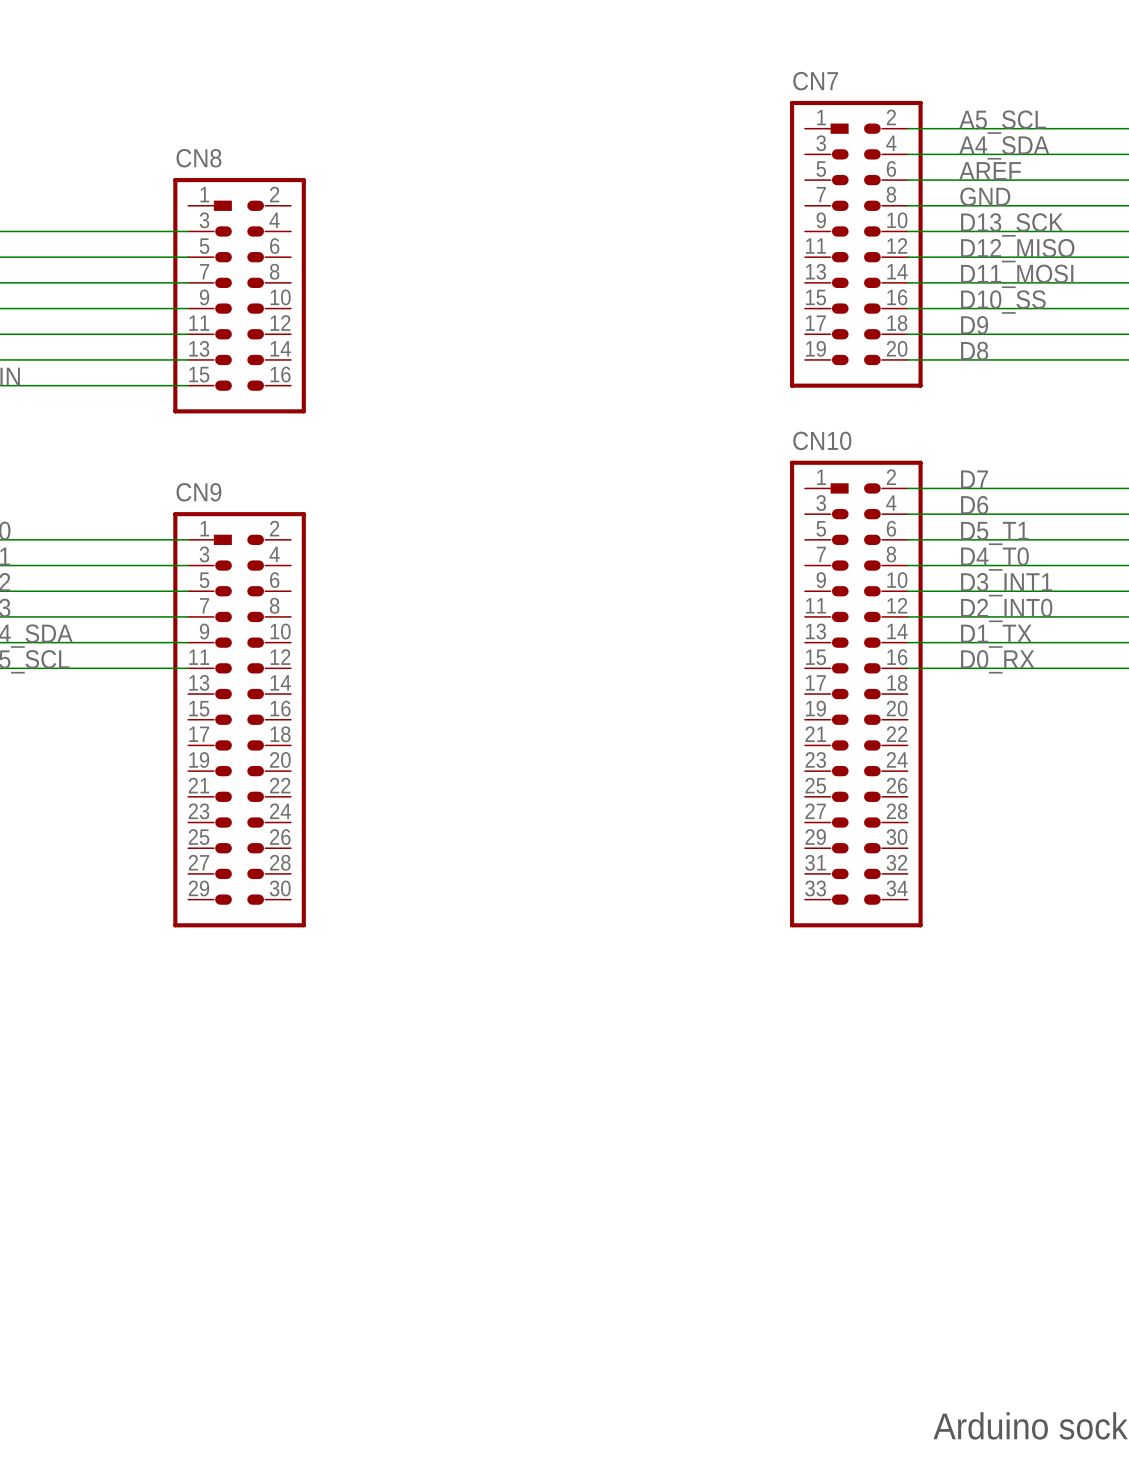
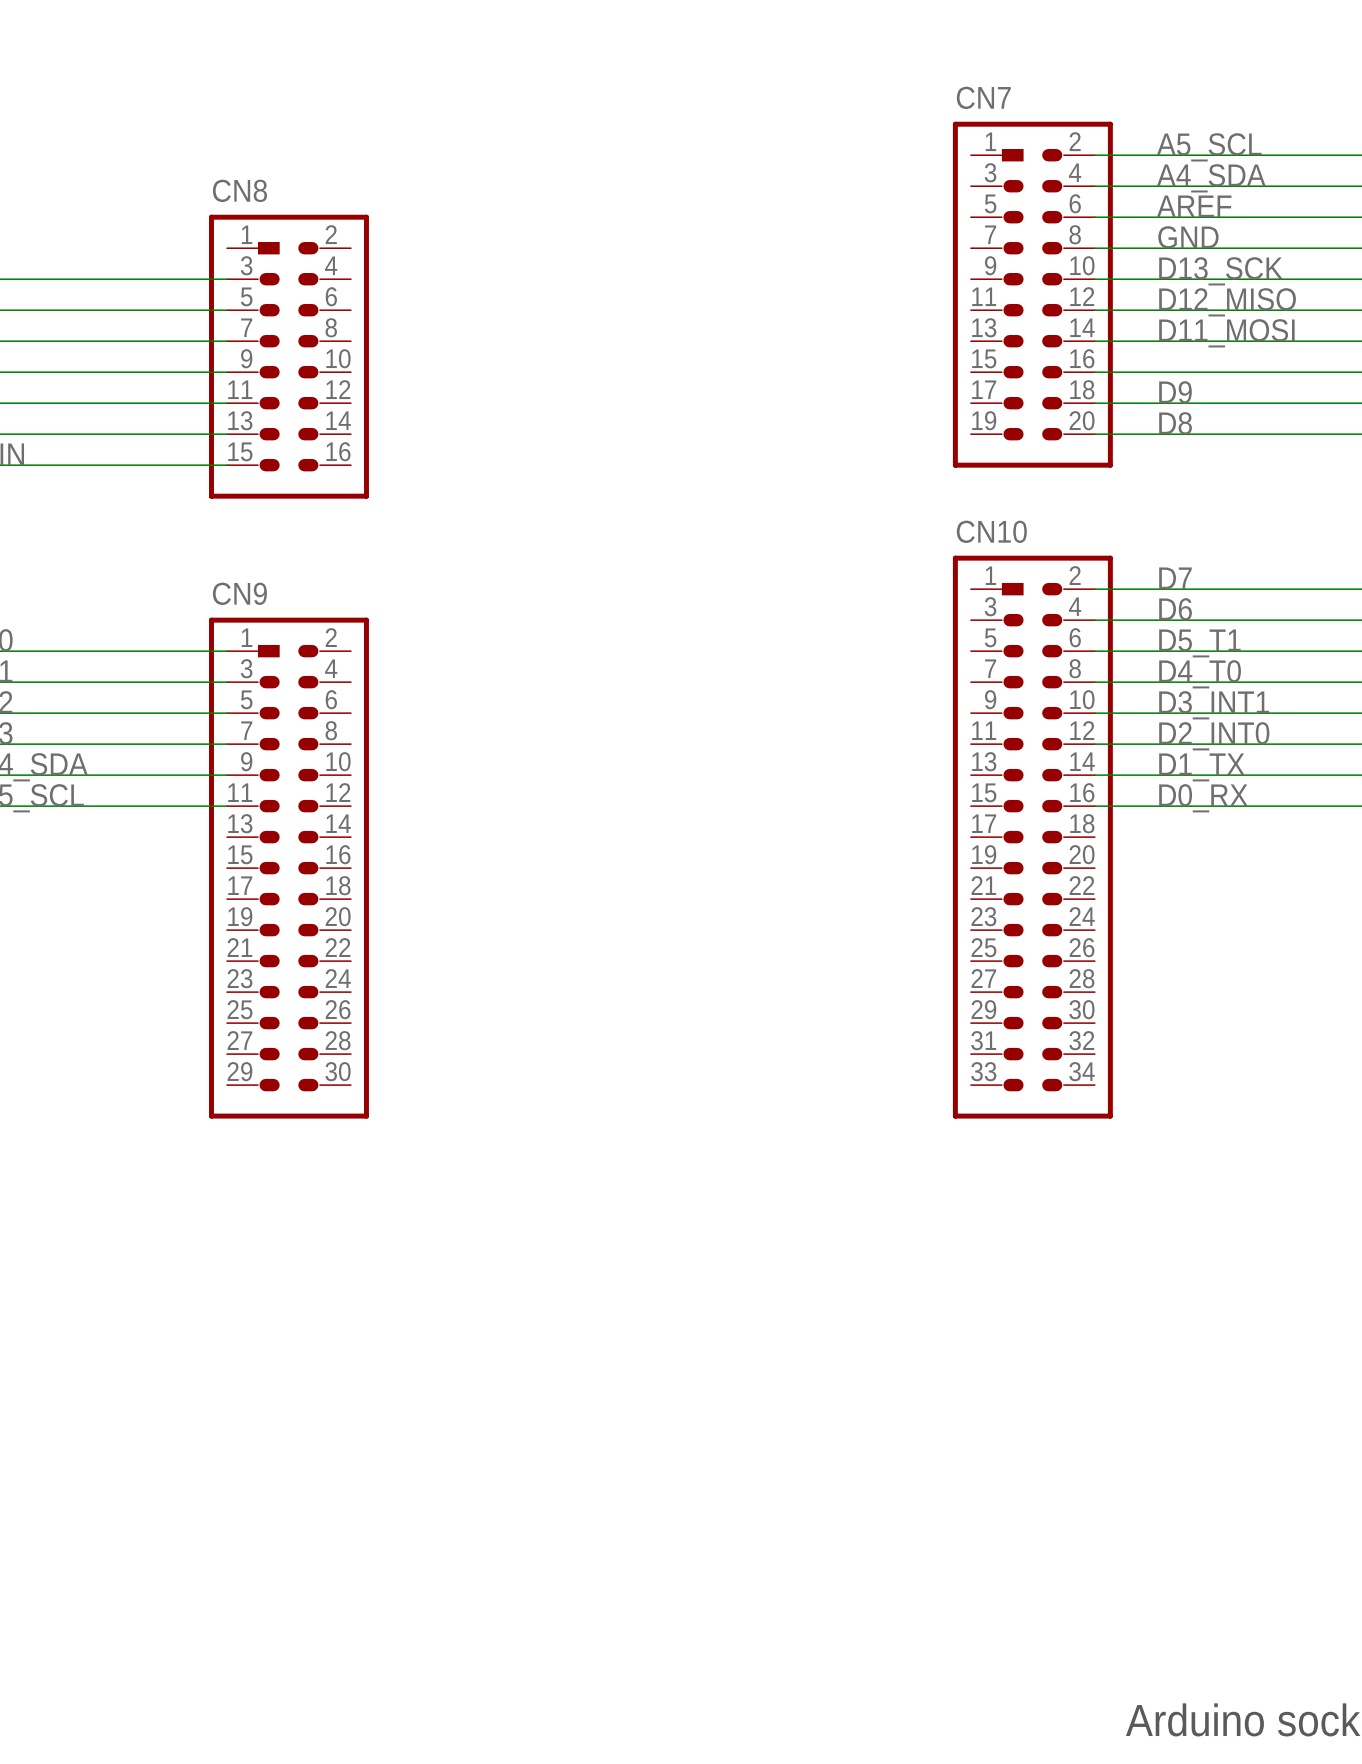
label: D10_SS (1003, 302) -> none

